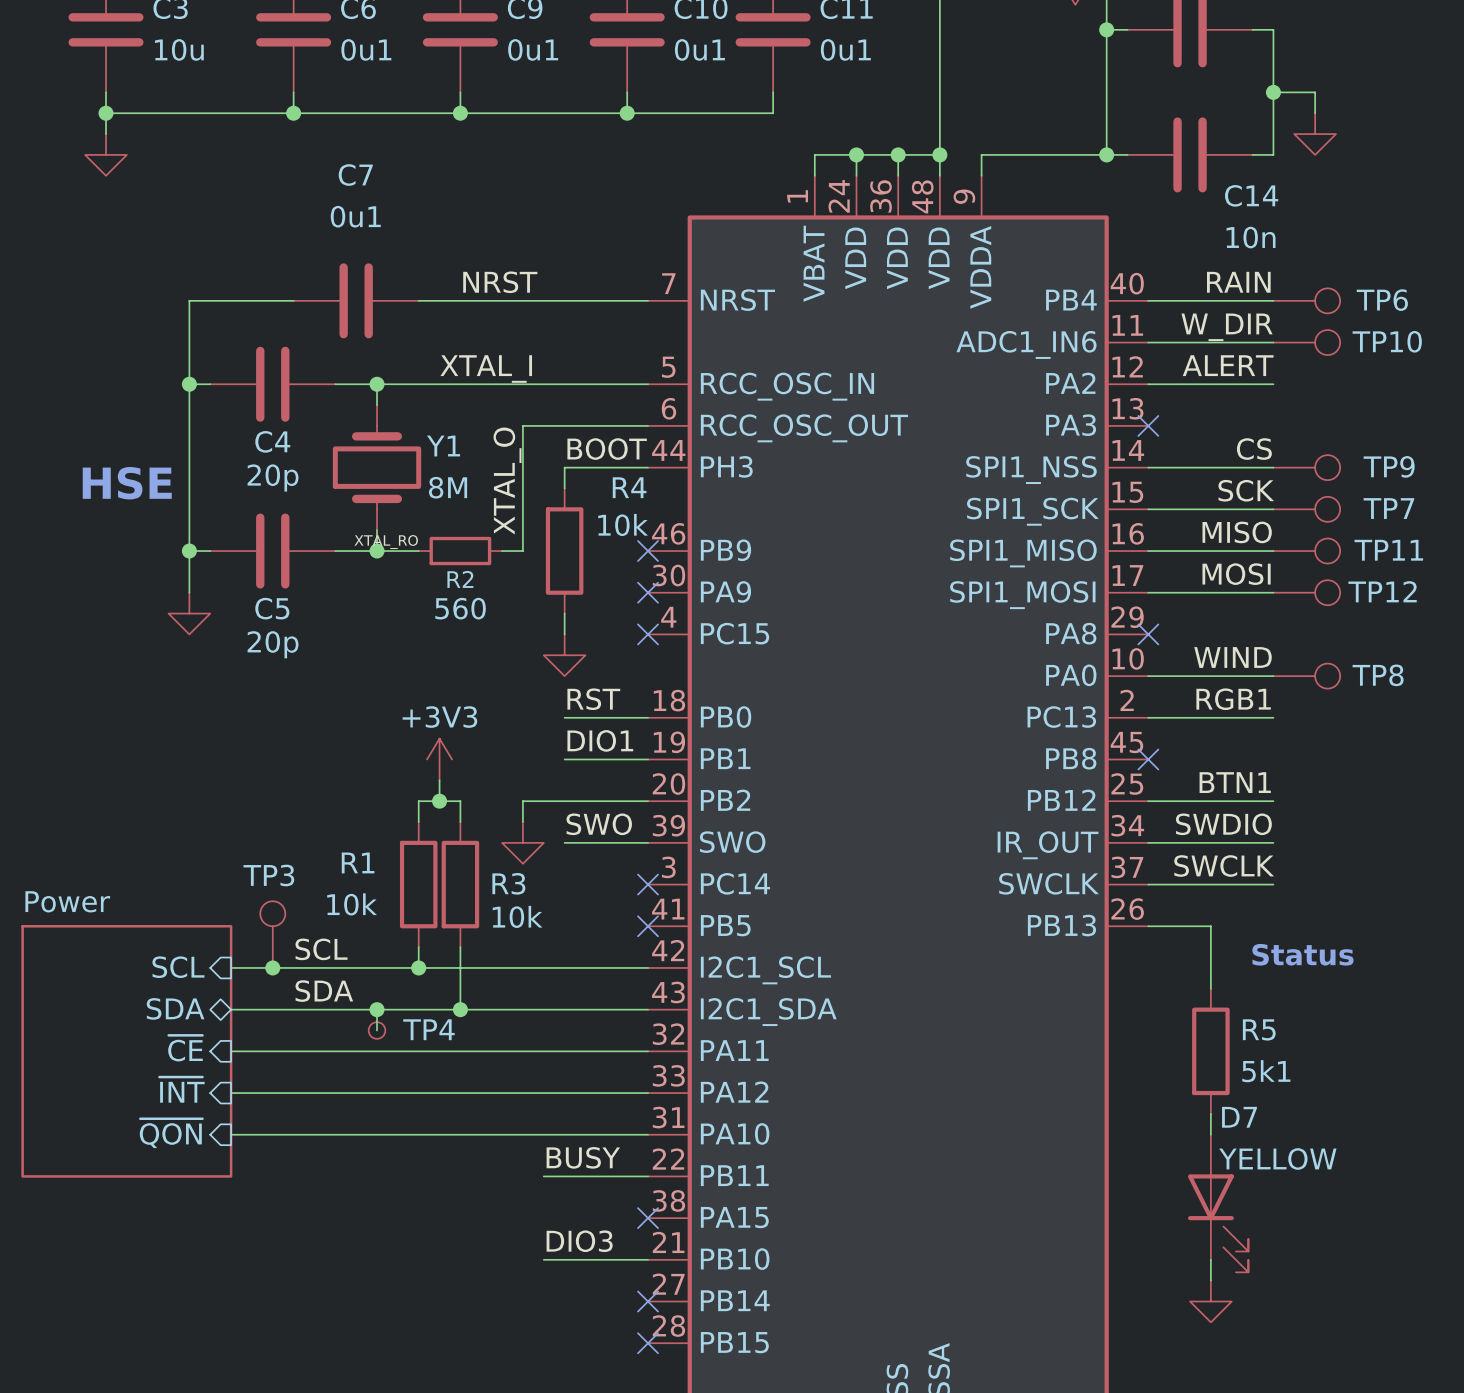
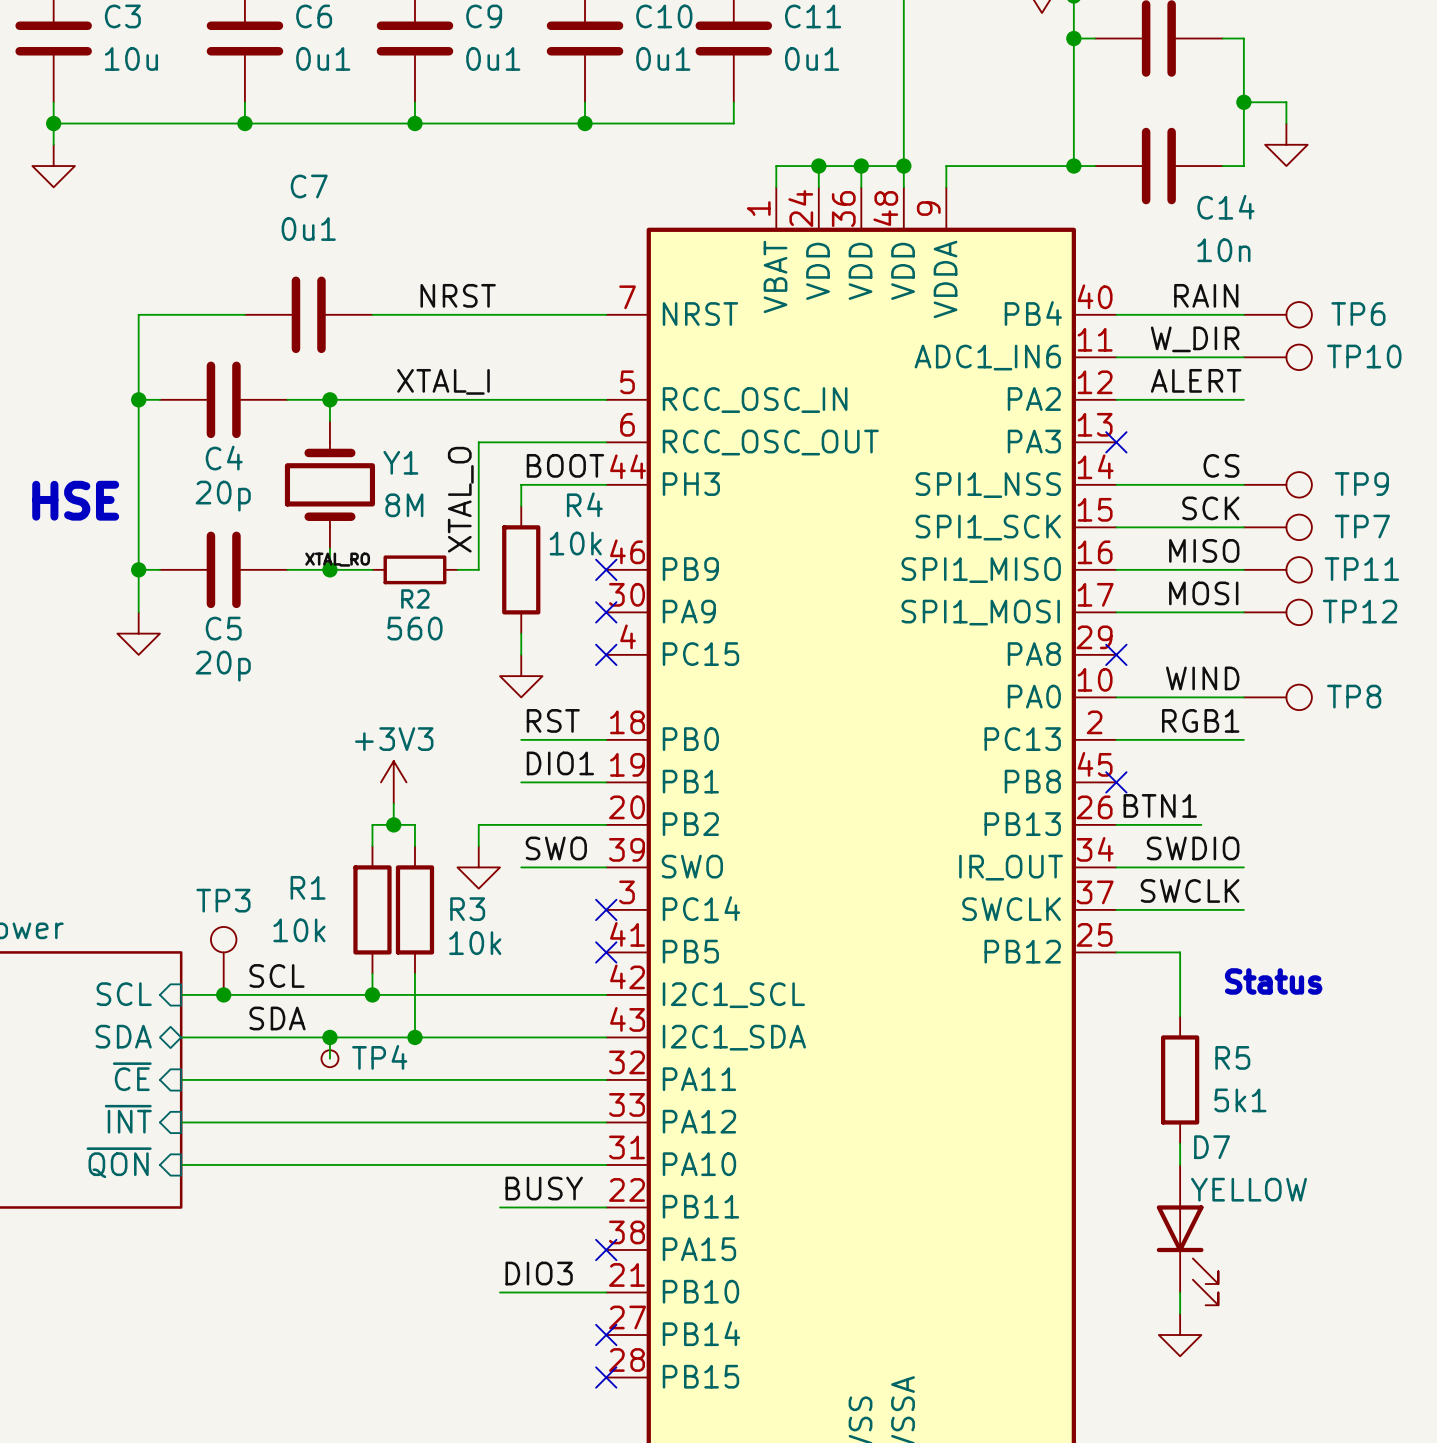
label position: BTN1 (1235, 782) -> BTN1 (1160, 805)
part pin number: 25 (1127, 784) -> 26 (1094, 807)
part pin name: PB12 (1061, 800) -> PB13 (1022, 824)
wire: (1231, 801) (1273, 801) -> none
part pin number: 26 (1127, 909) -> 25 (1094, 934)
part pin name: PB13 (1061, 925) -> PB12 (1022, 951)

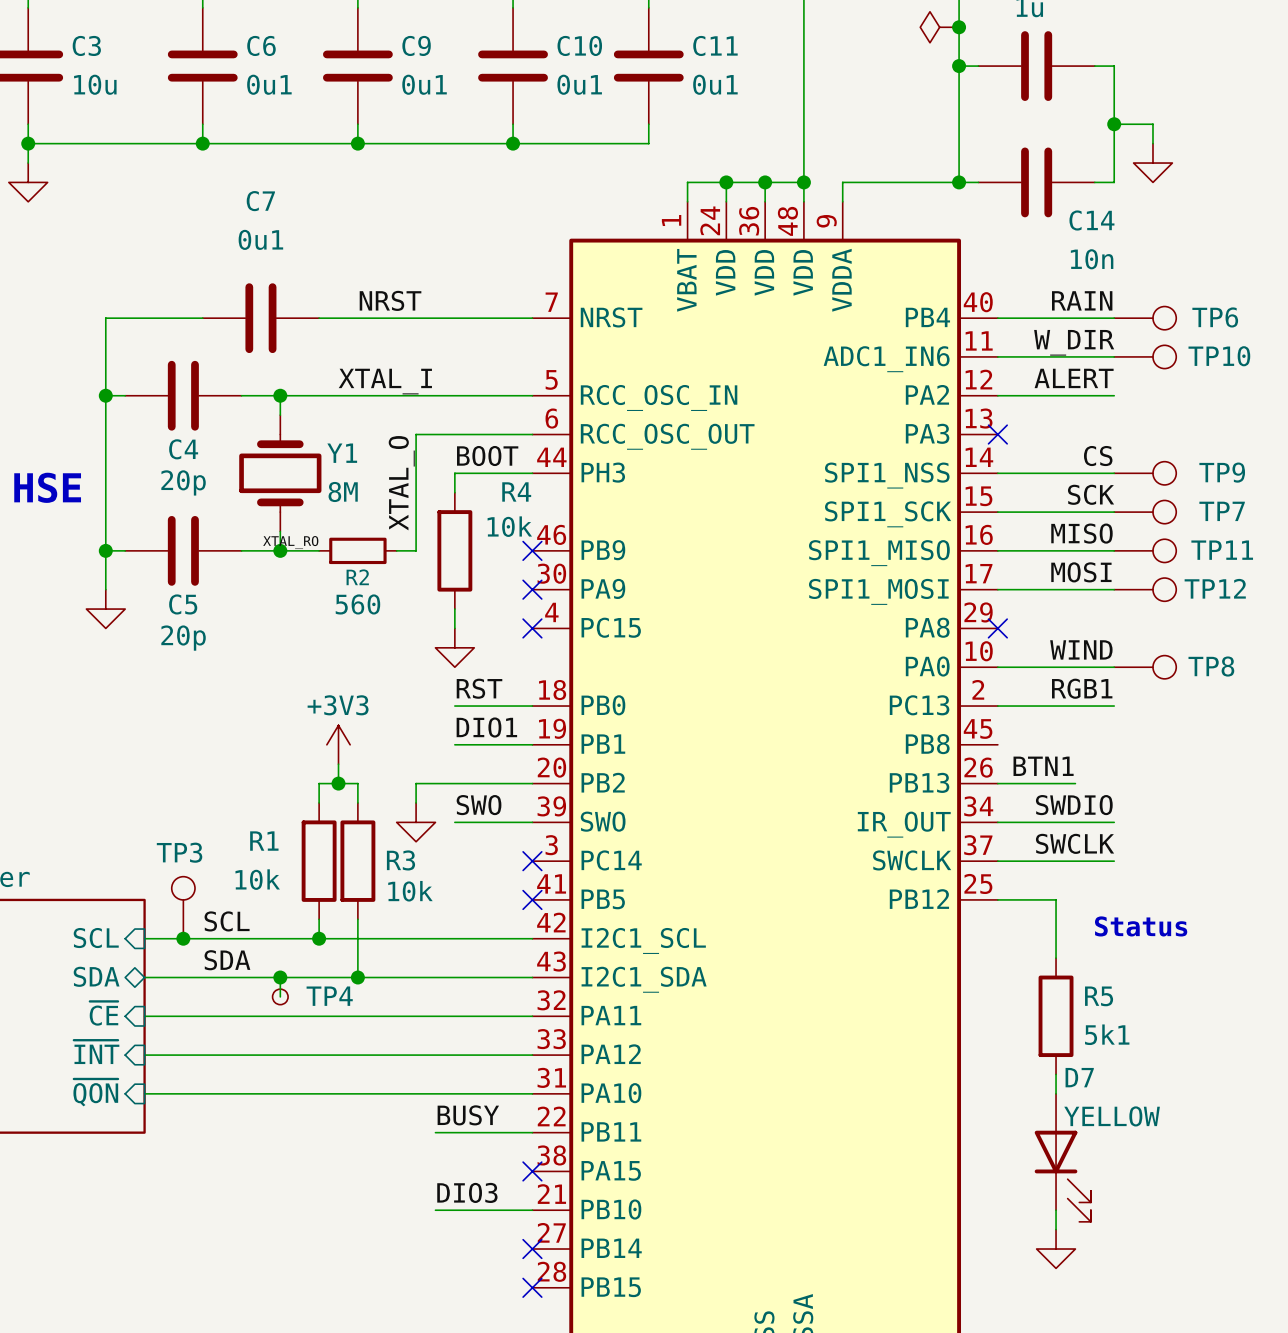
no-connect mark: (1116, 782) -> none

